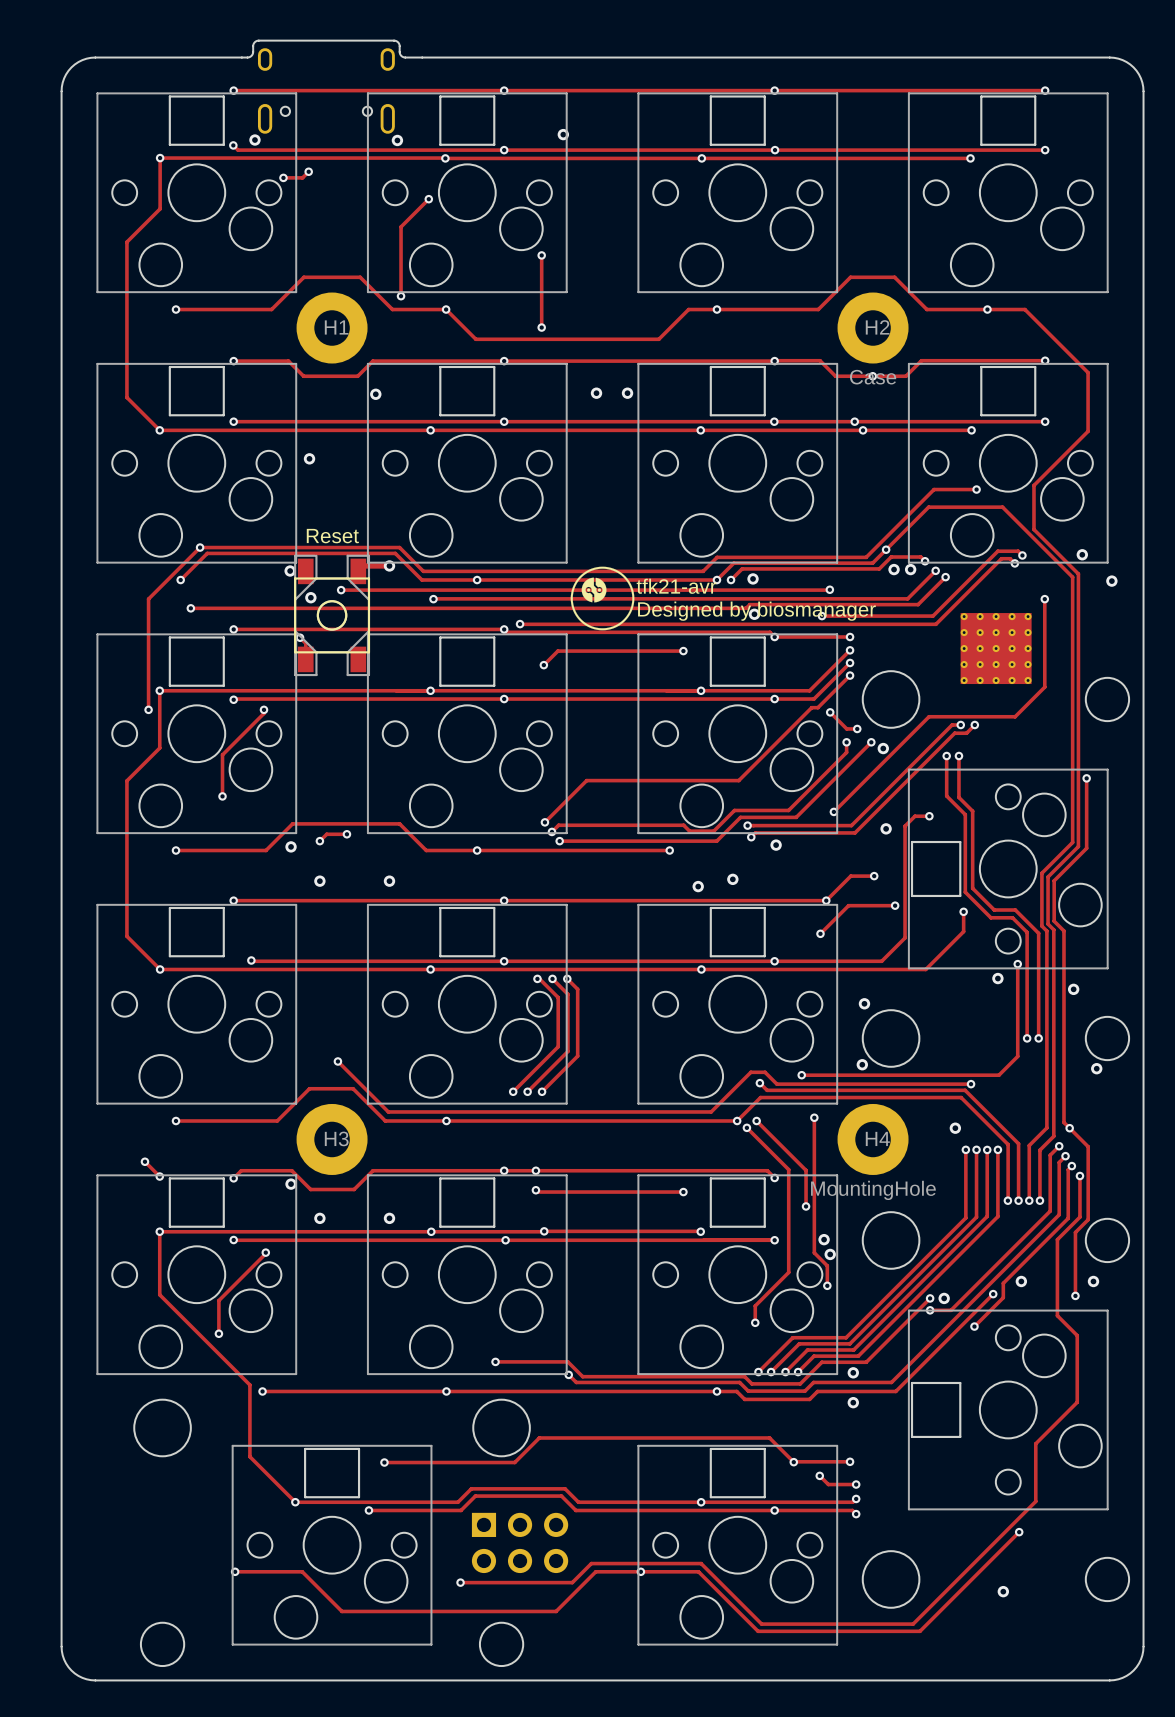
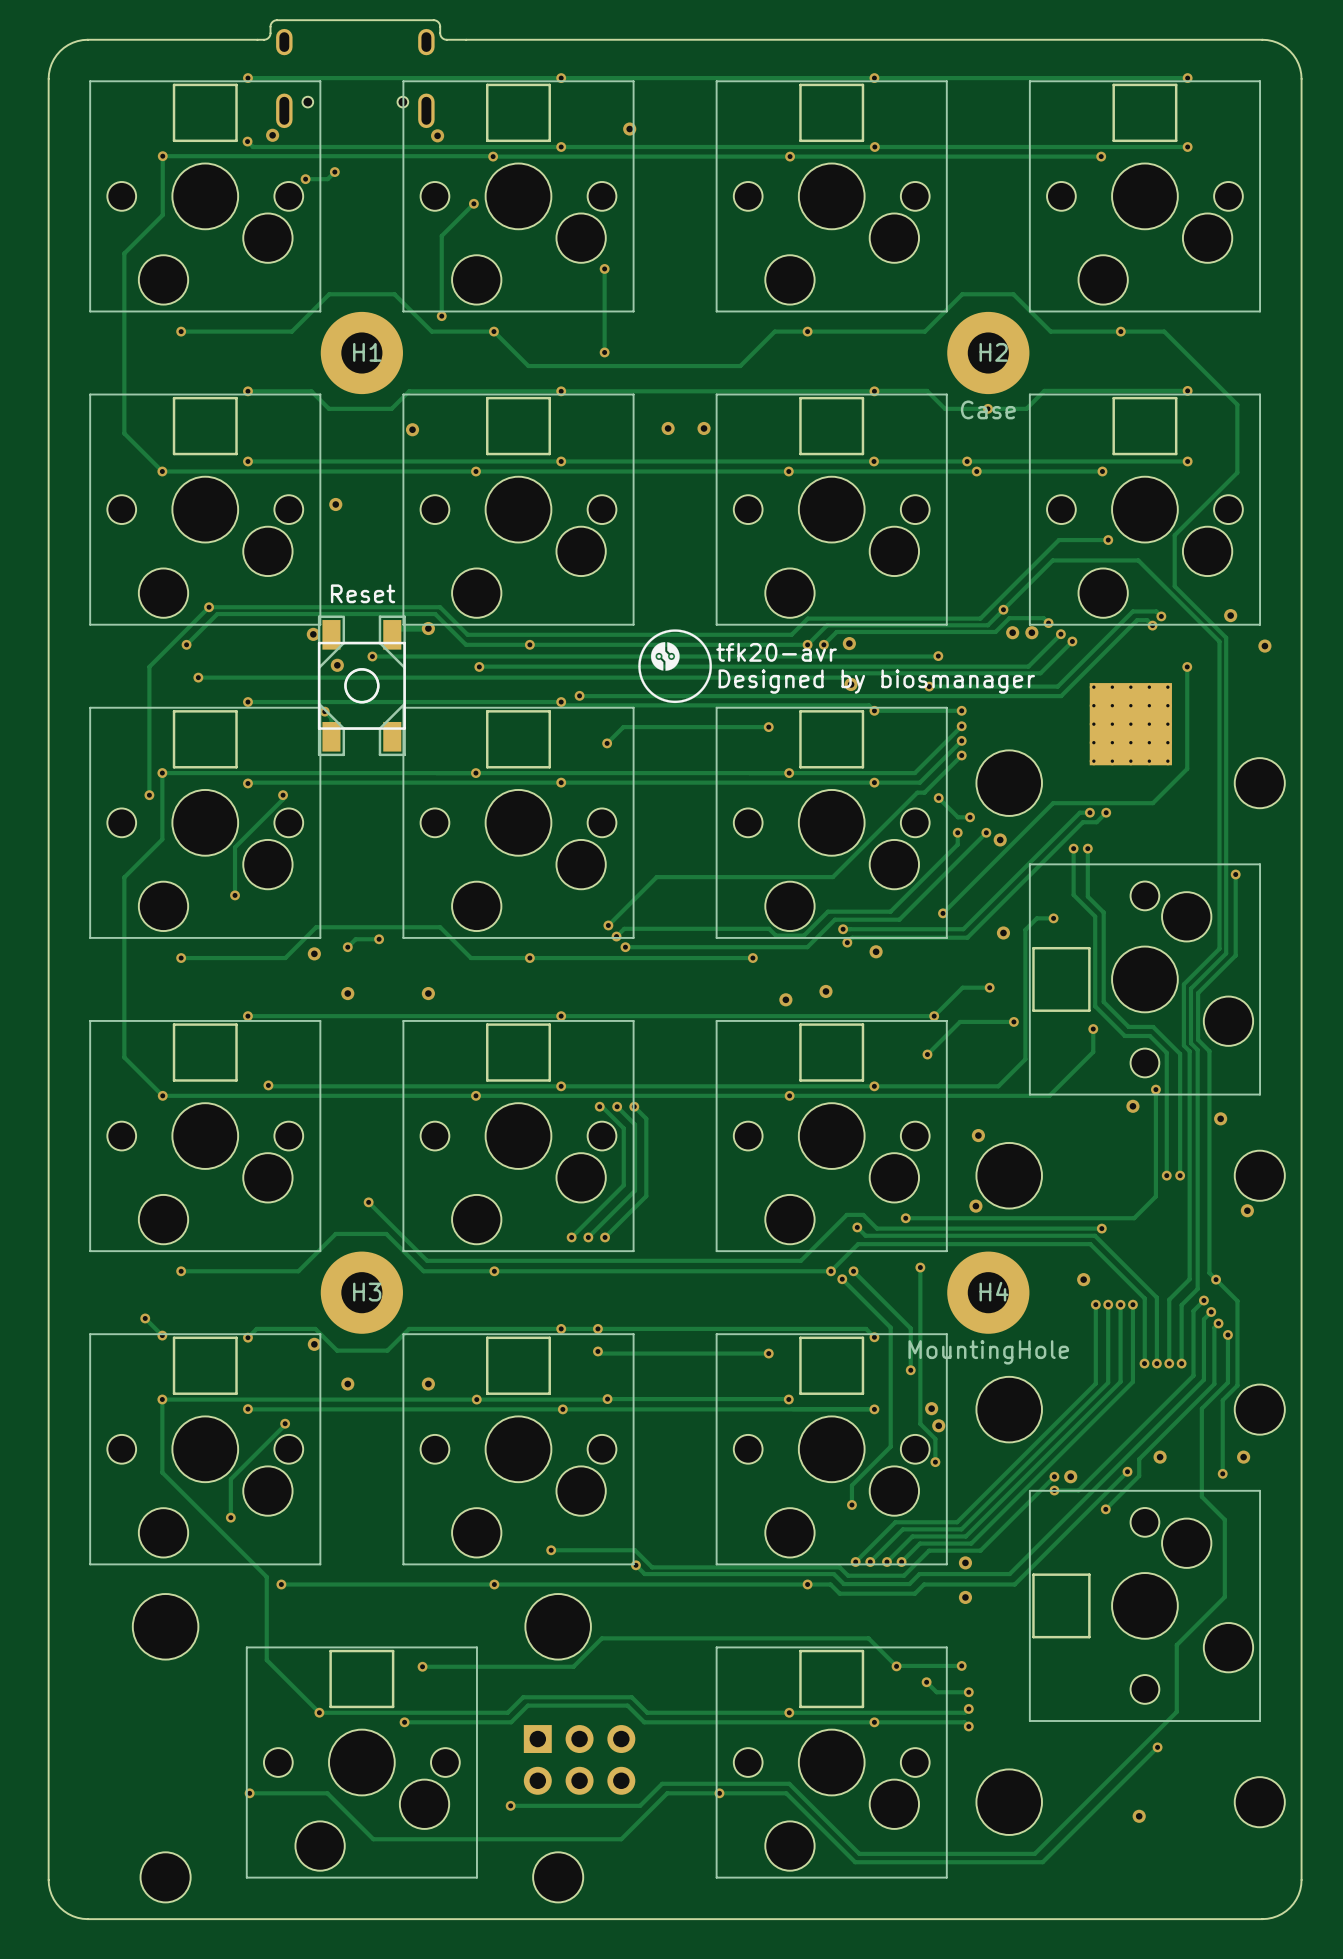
text: tfk21-avr (676, 586) -> tfk20-avr (776, 652)

